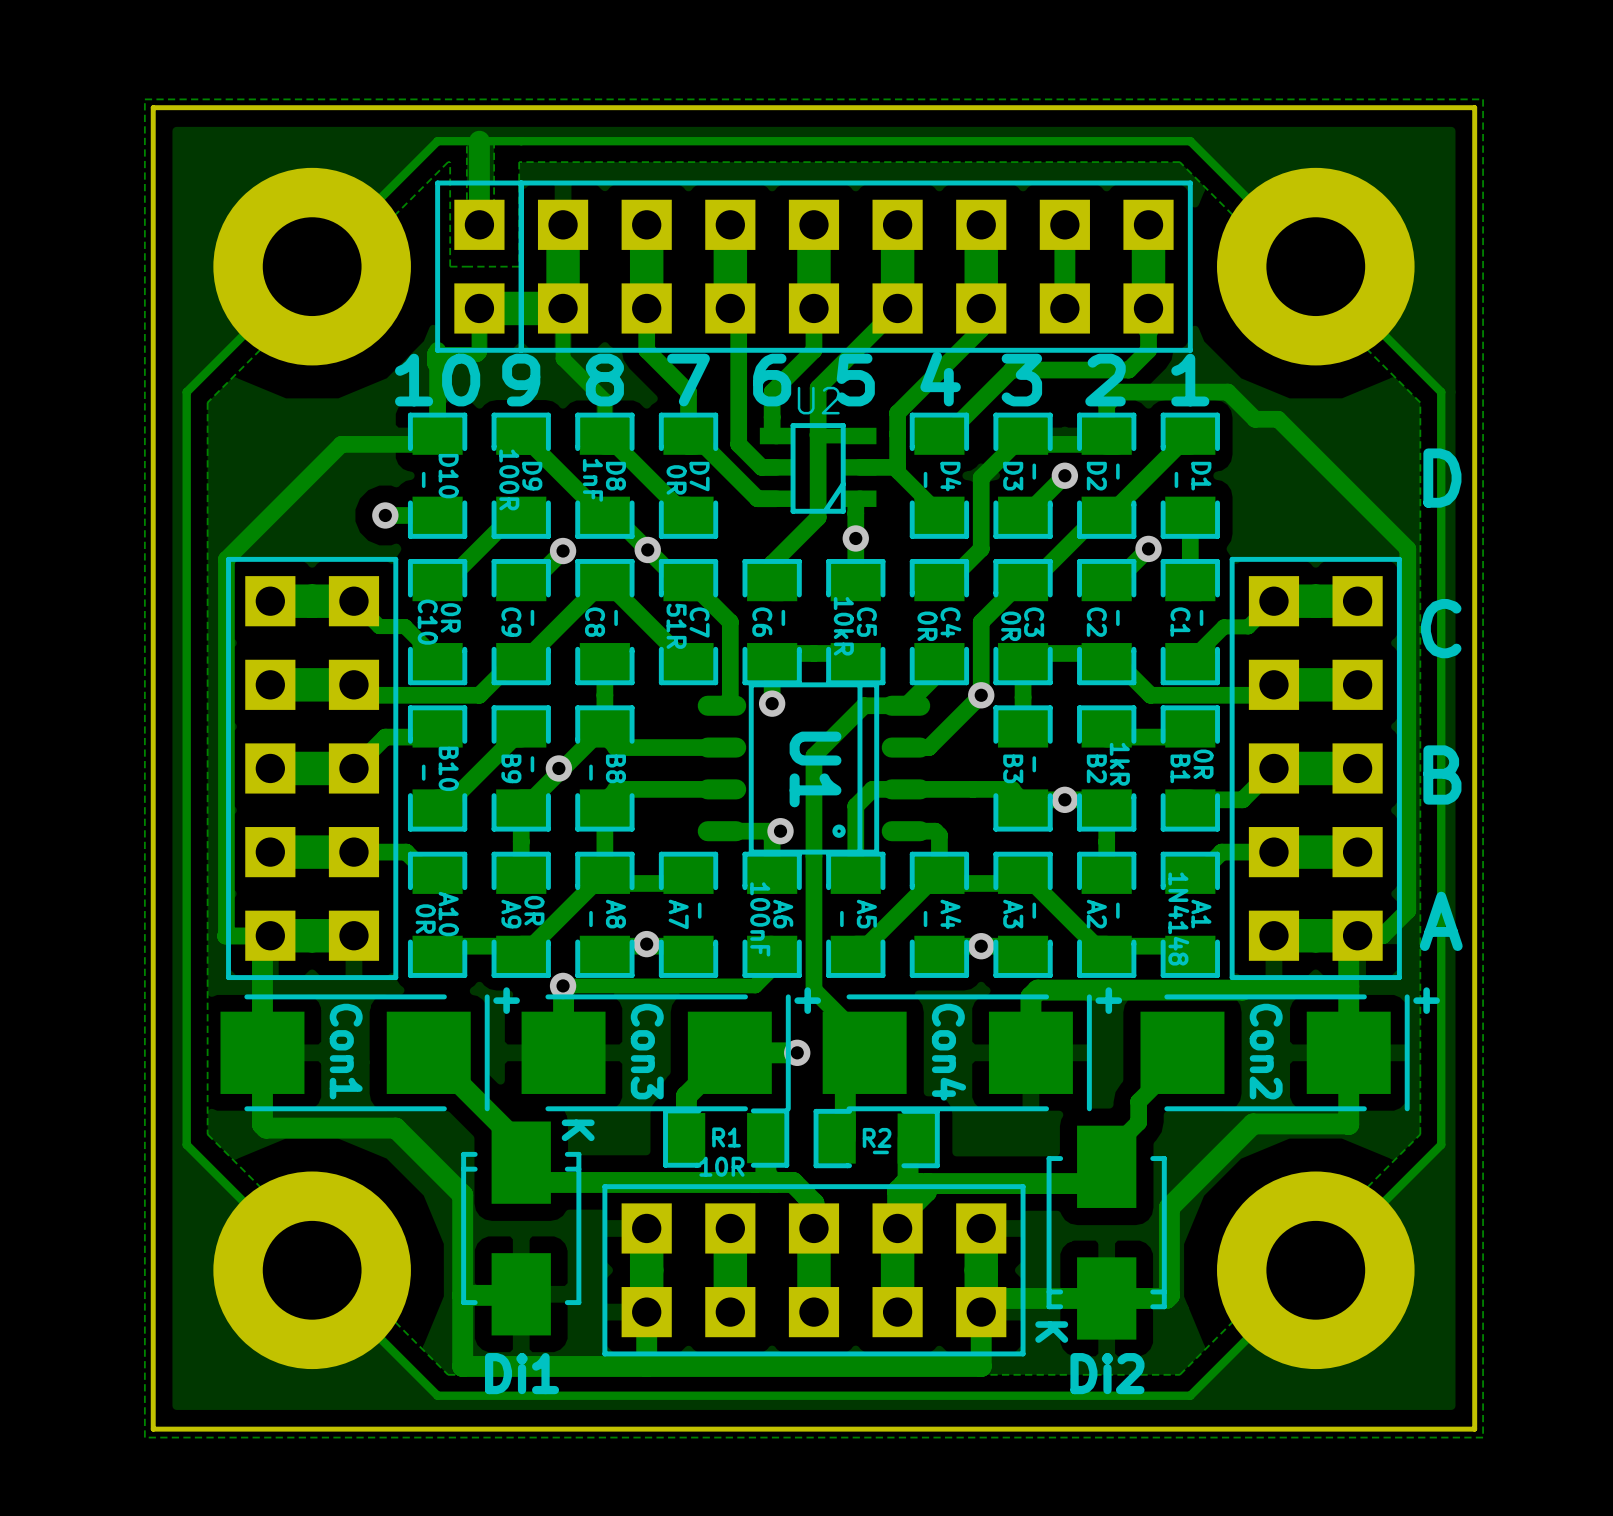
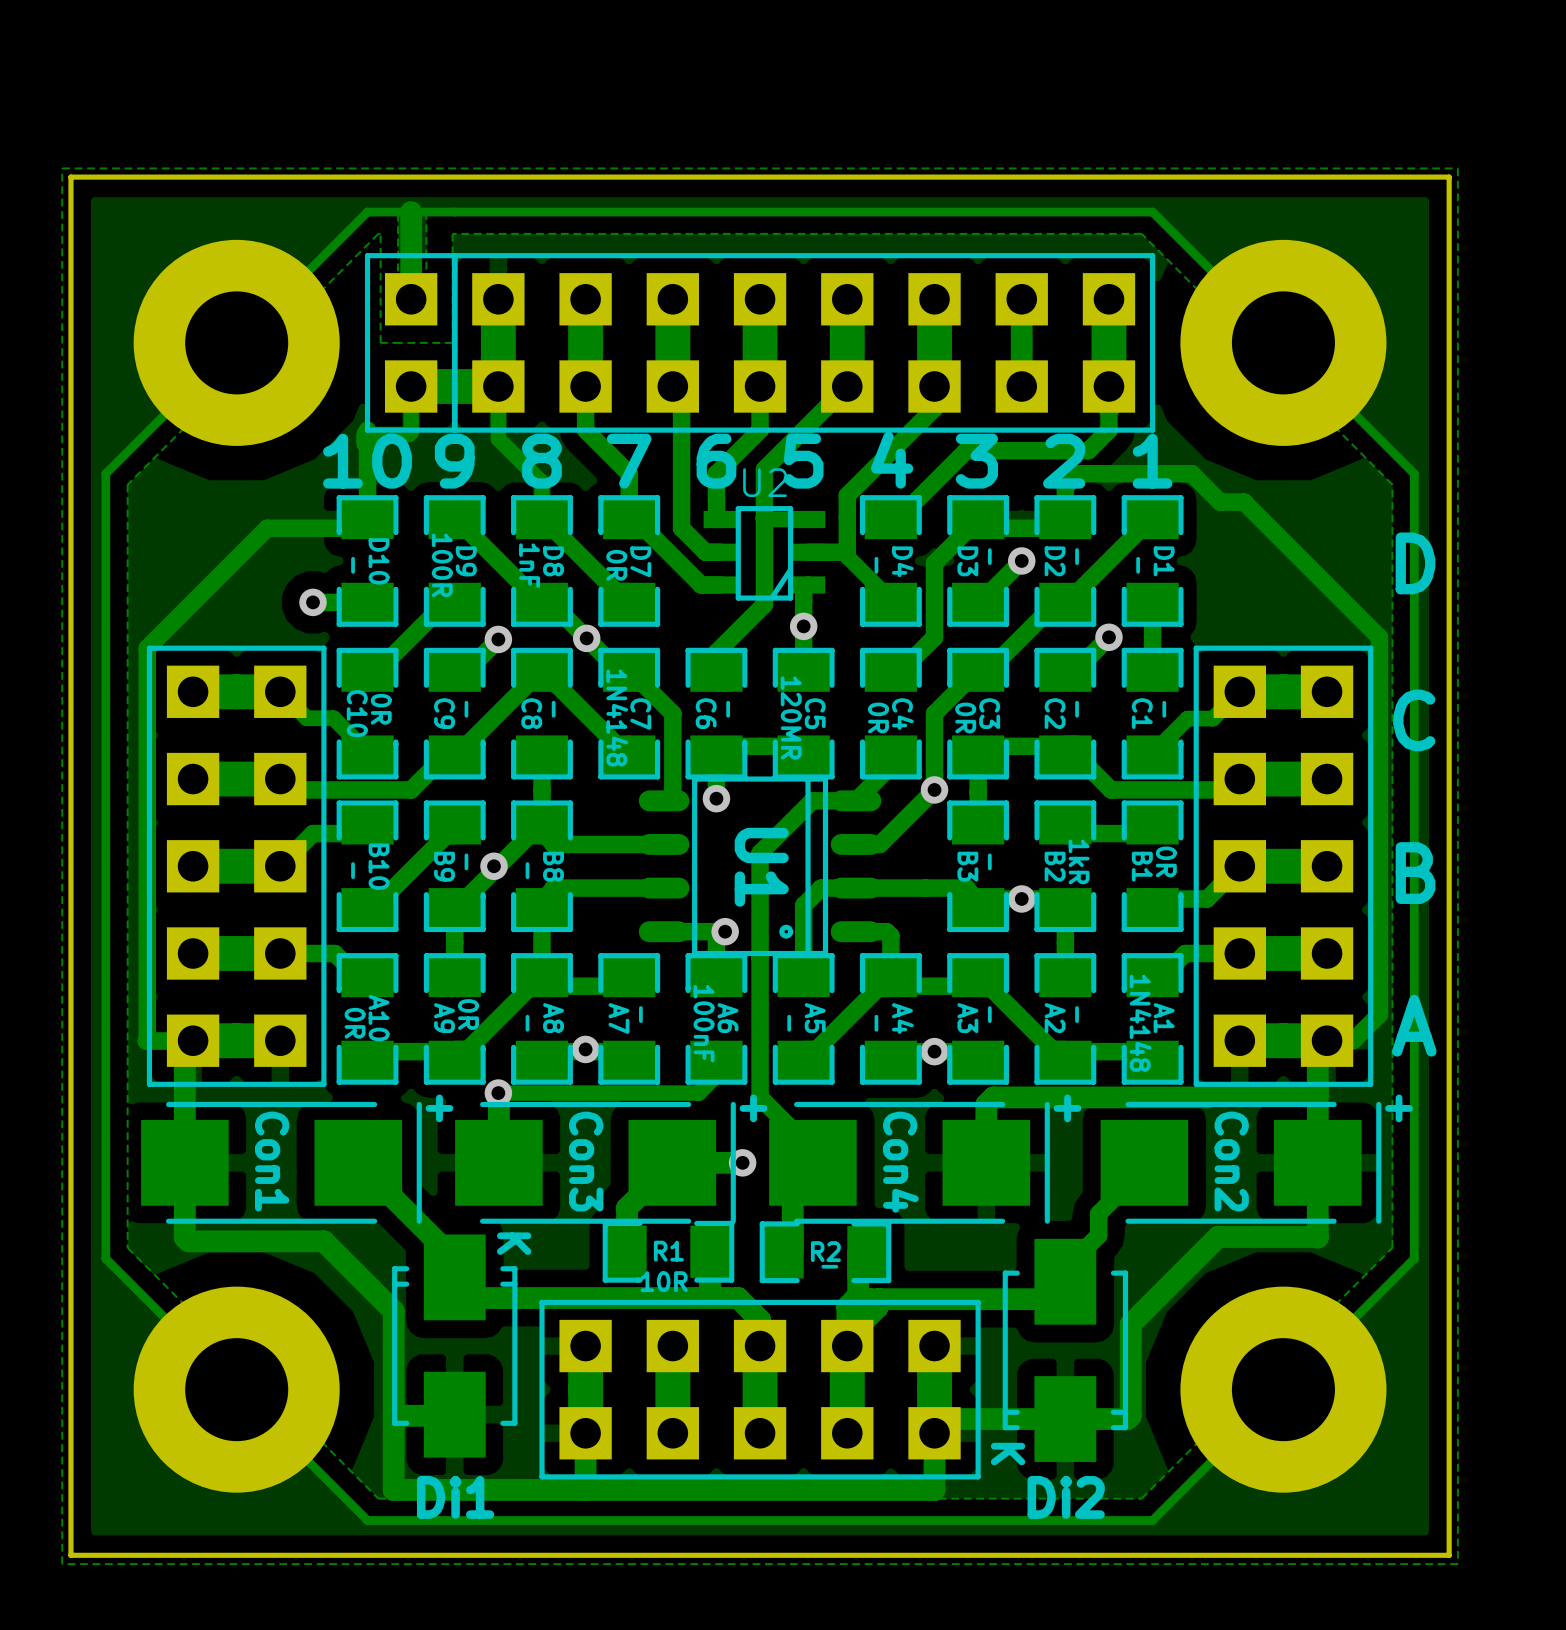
C7 value: 51R (676, 626) -> 1N4148 (617, 717)
C5 value: 10kR (843, 626) -> 120MR (791, 717)

